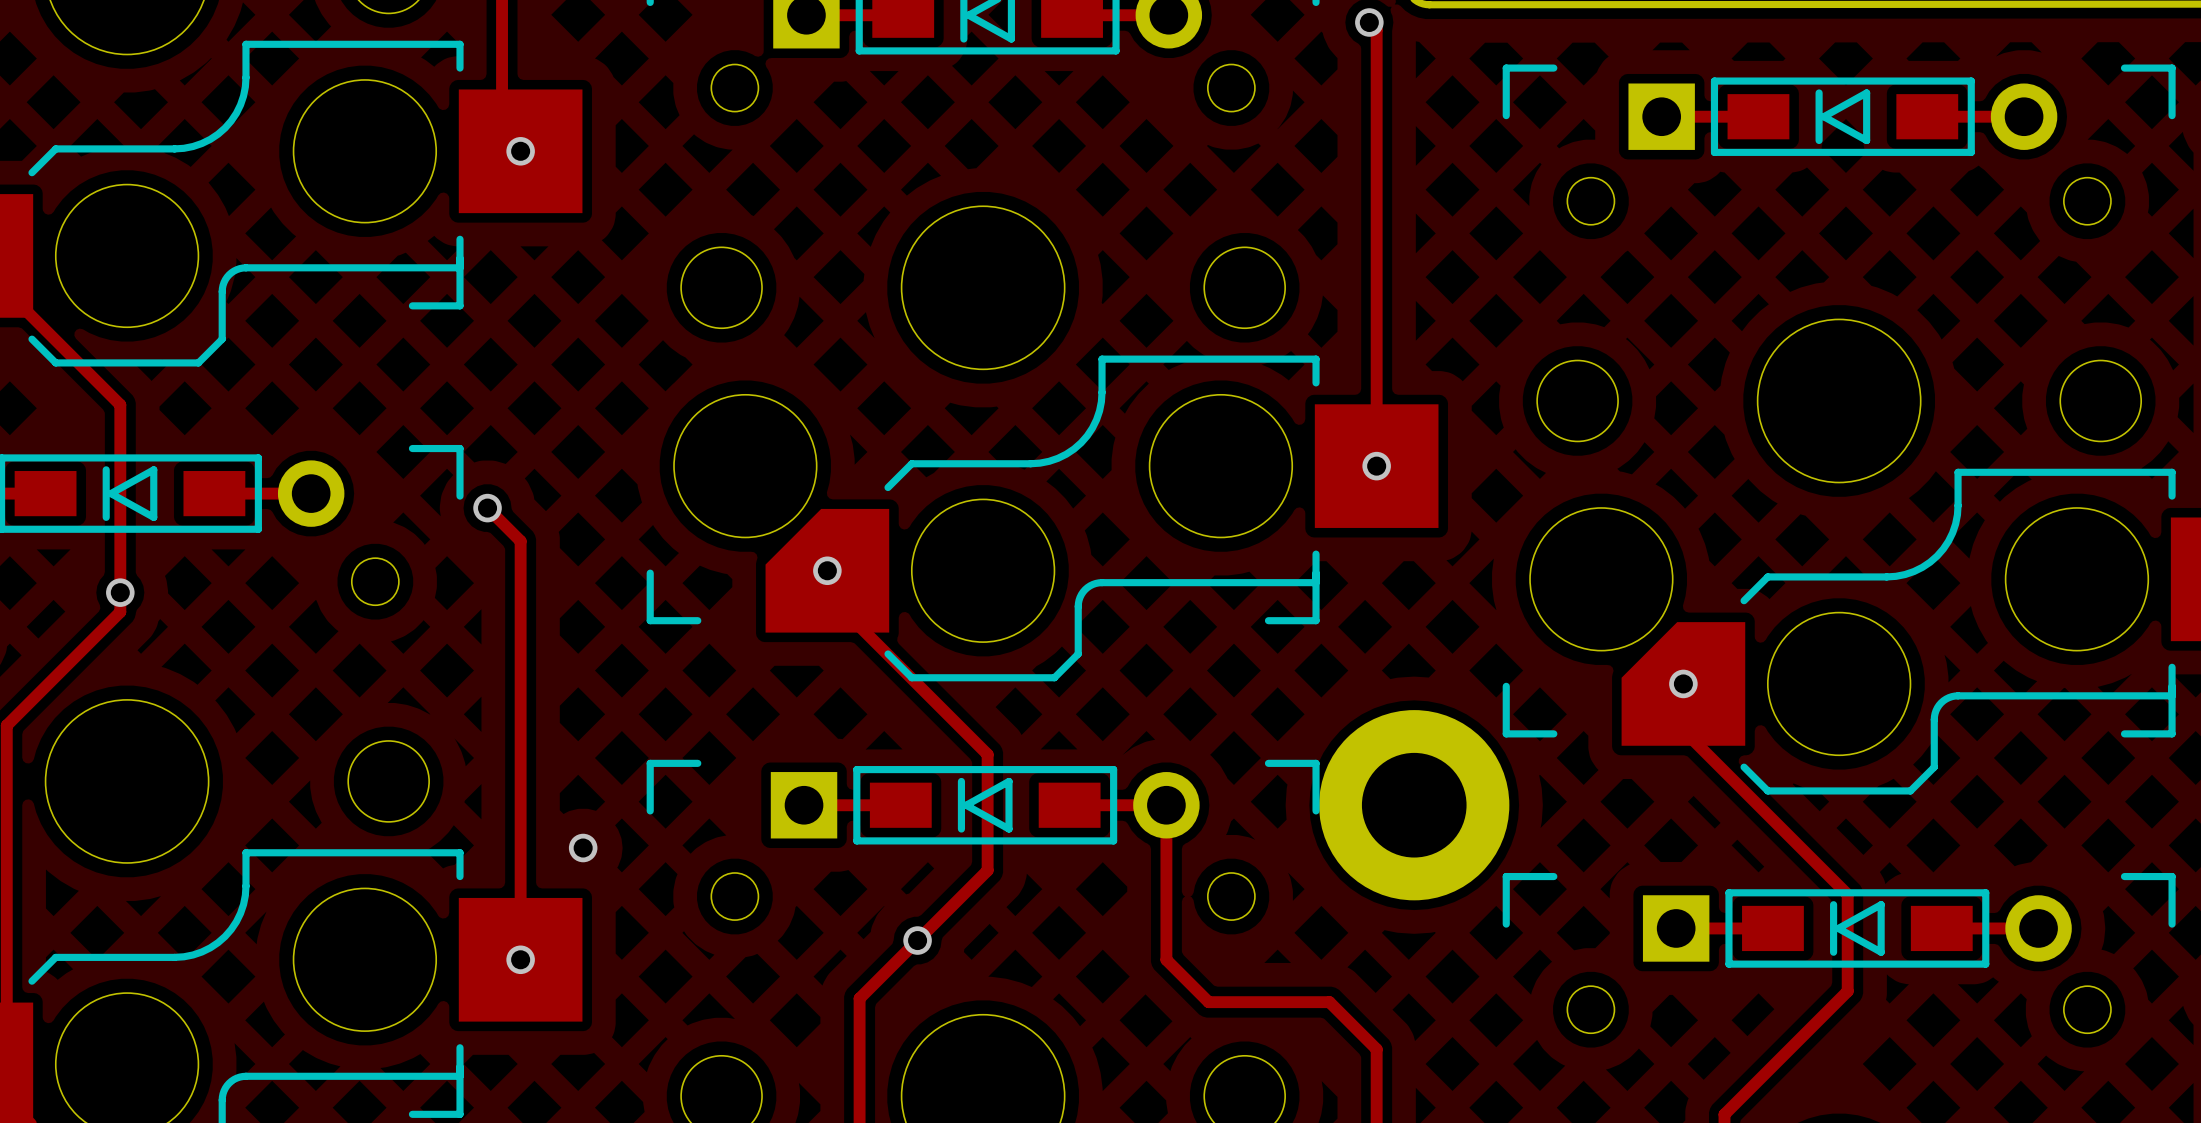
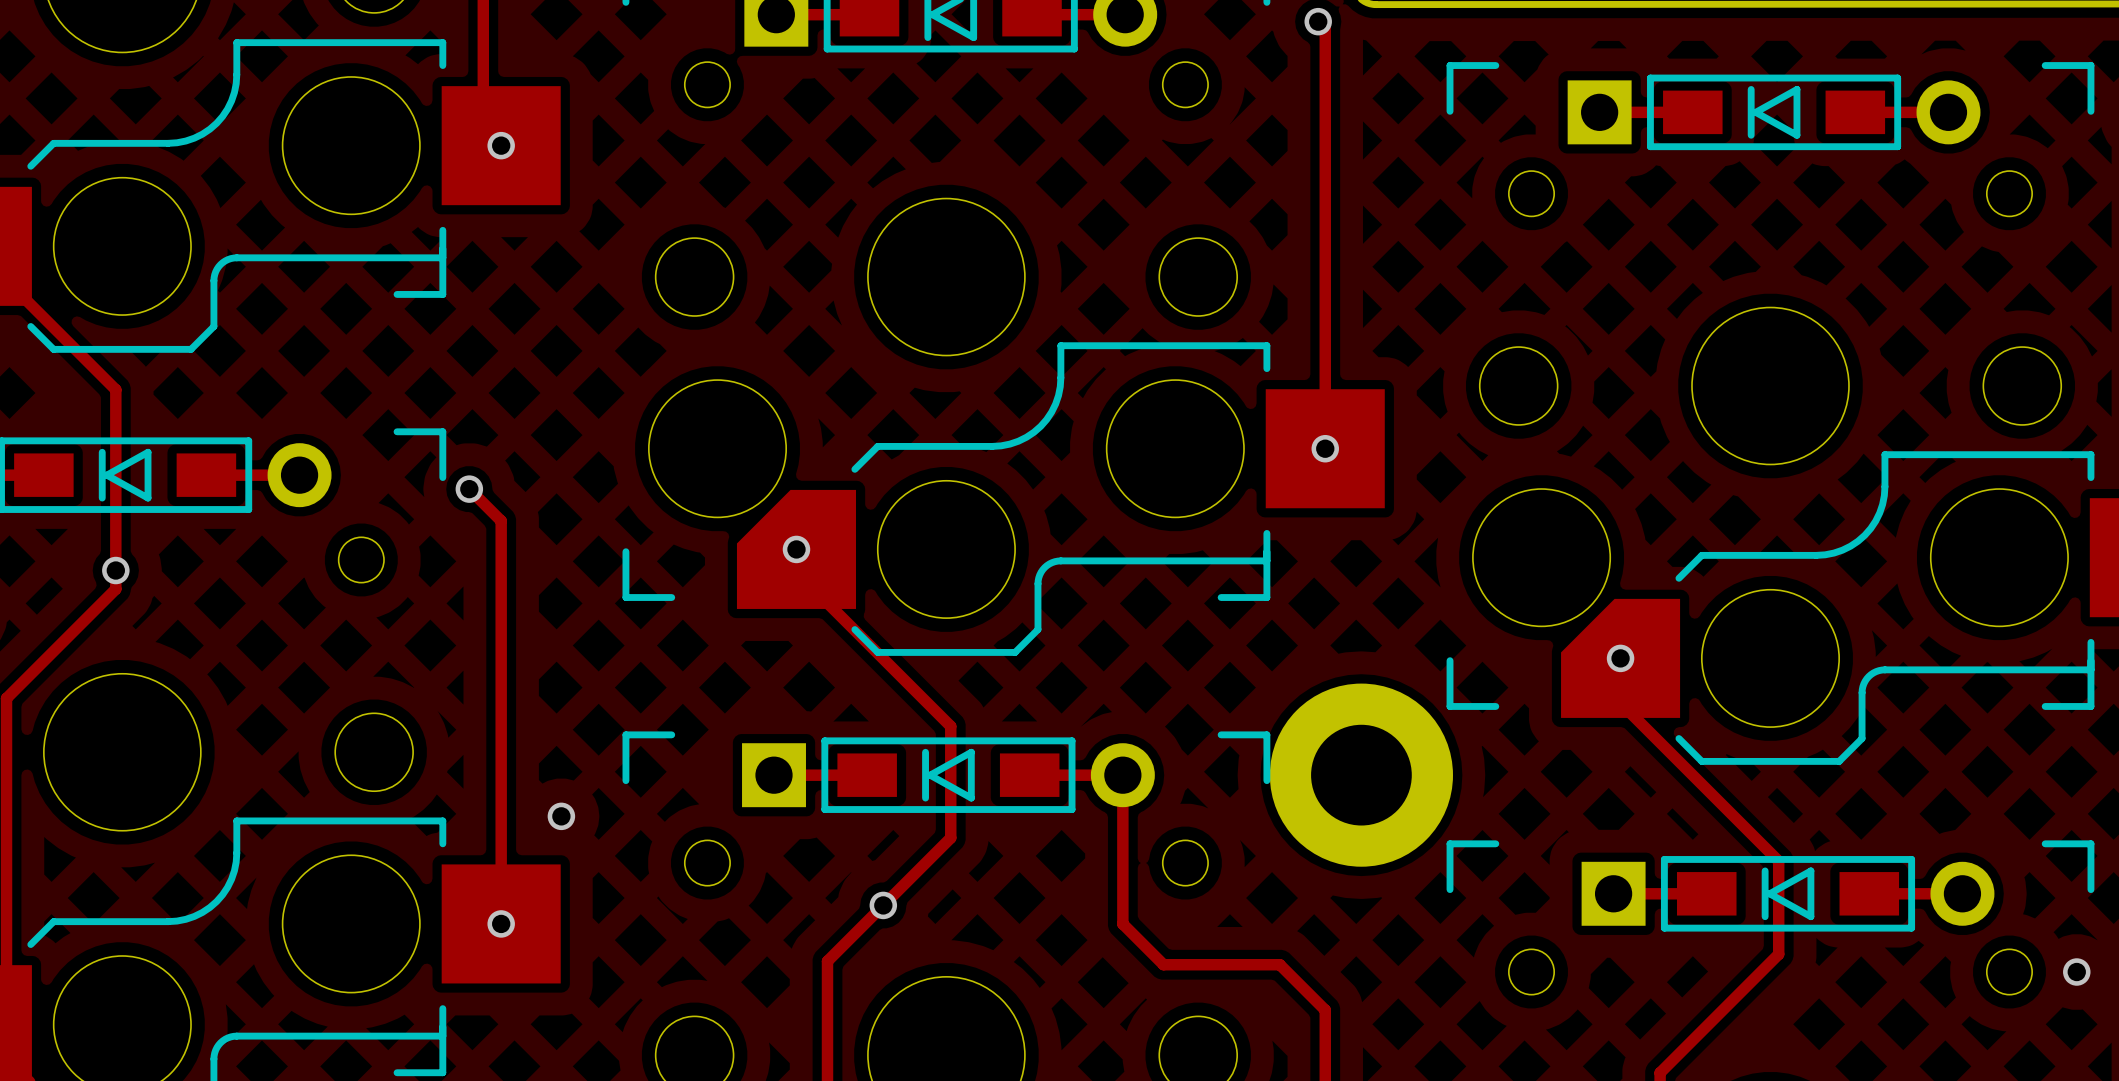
via: none -> (2076, 972)

